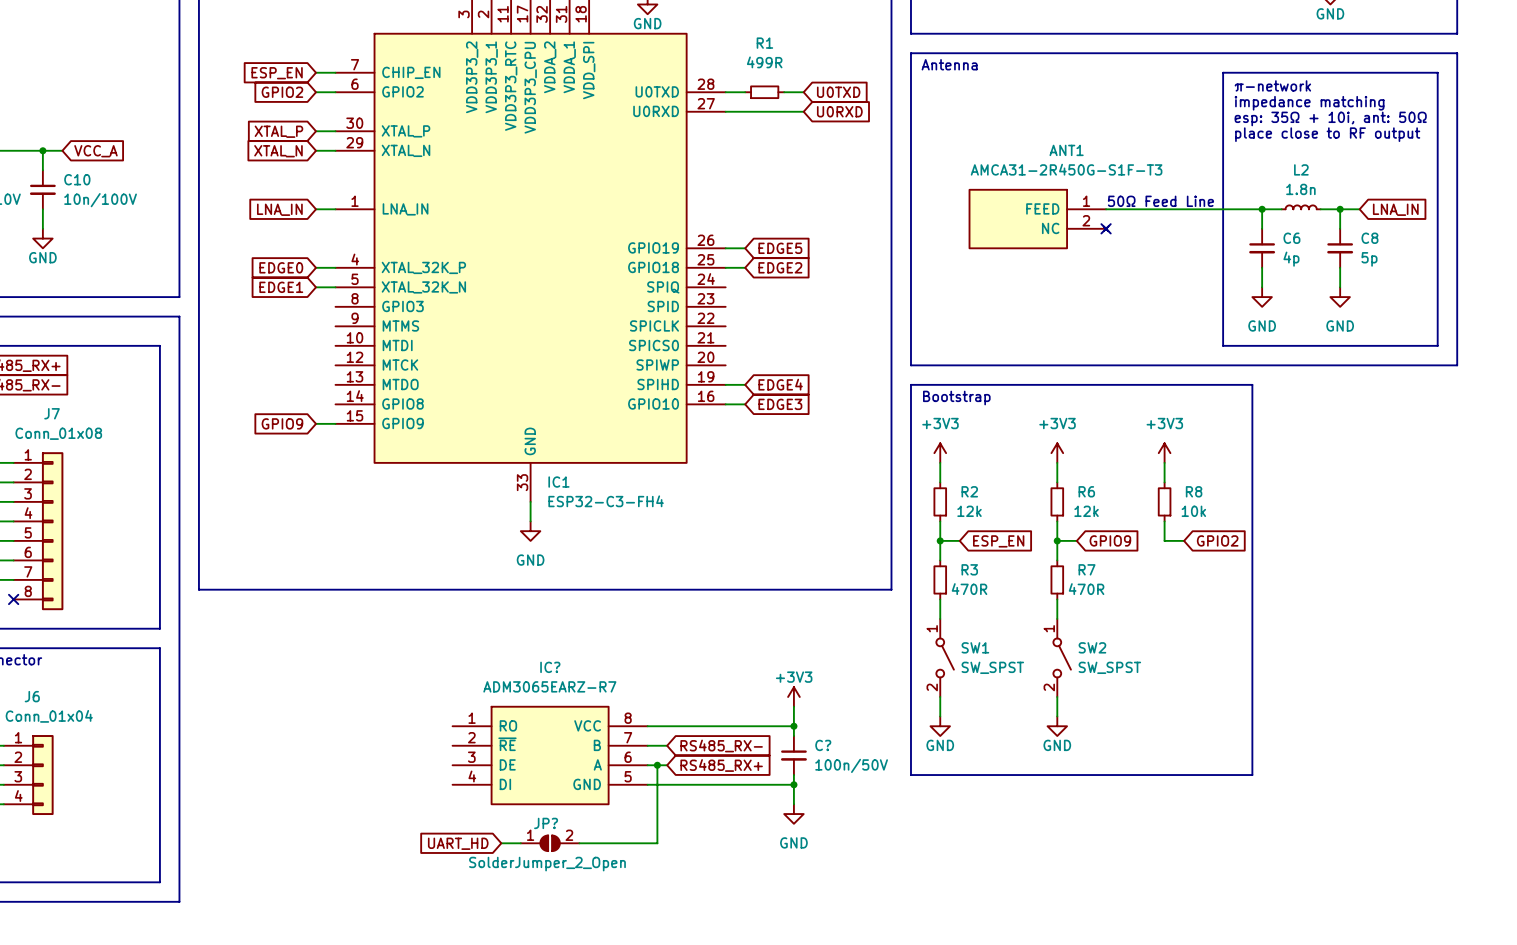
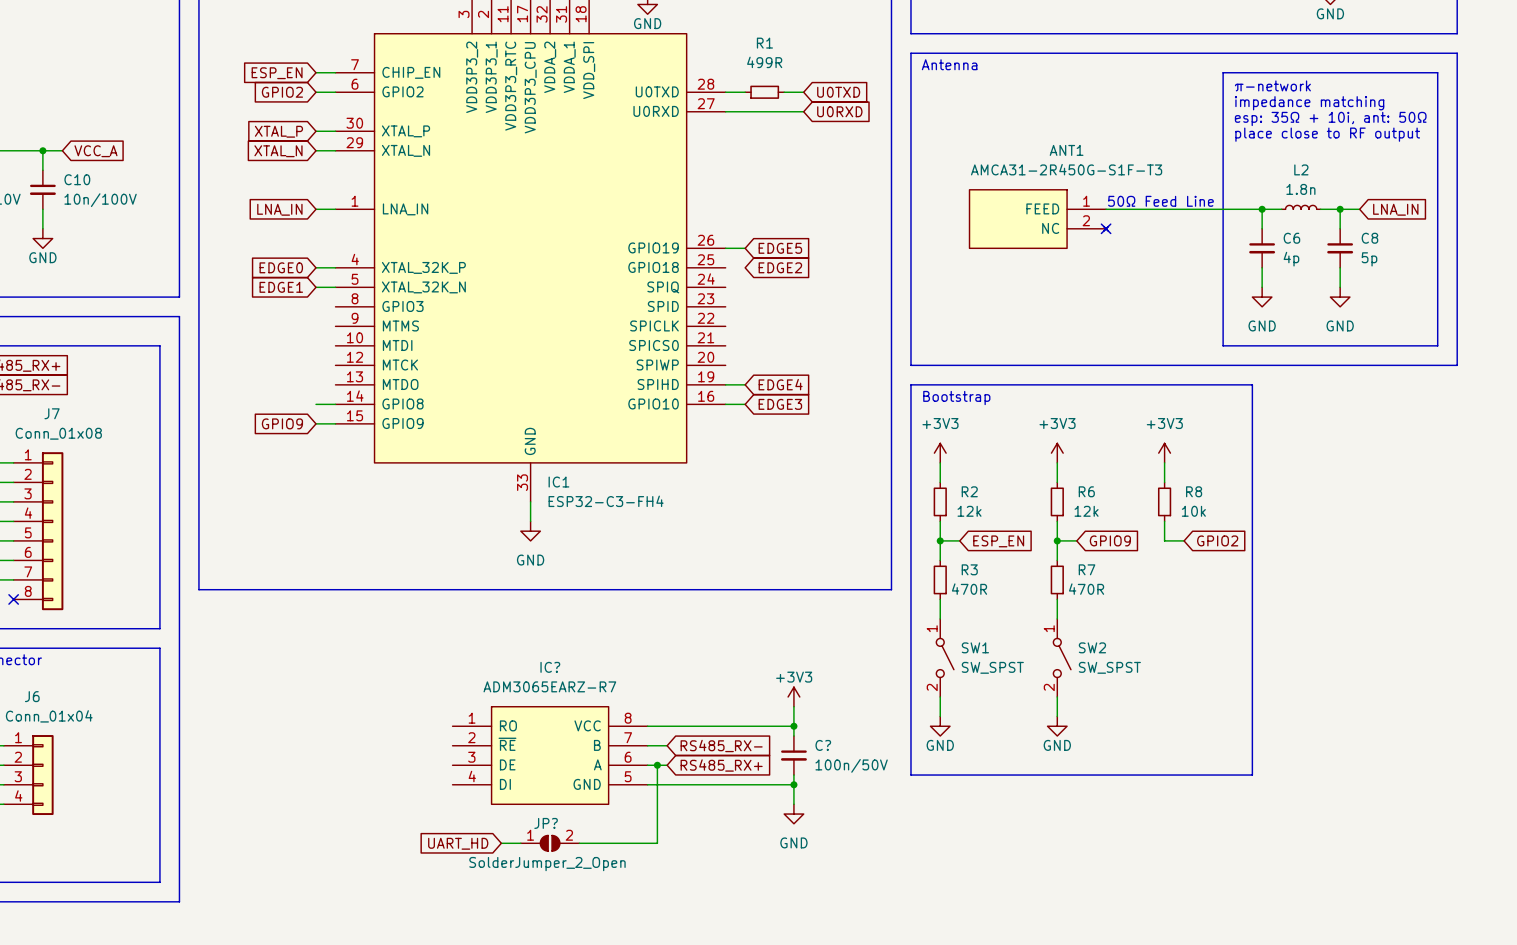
wire: (725, 267) (745, 267) -> none
wire: none -> (316, 404) (335, 404)

